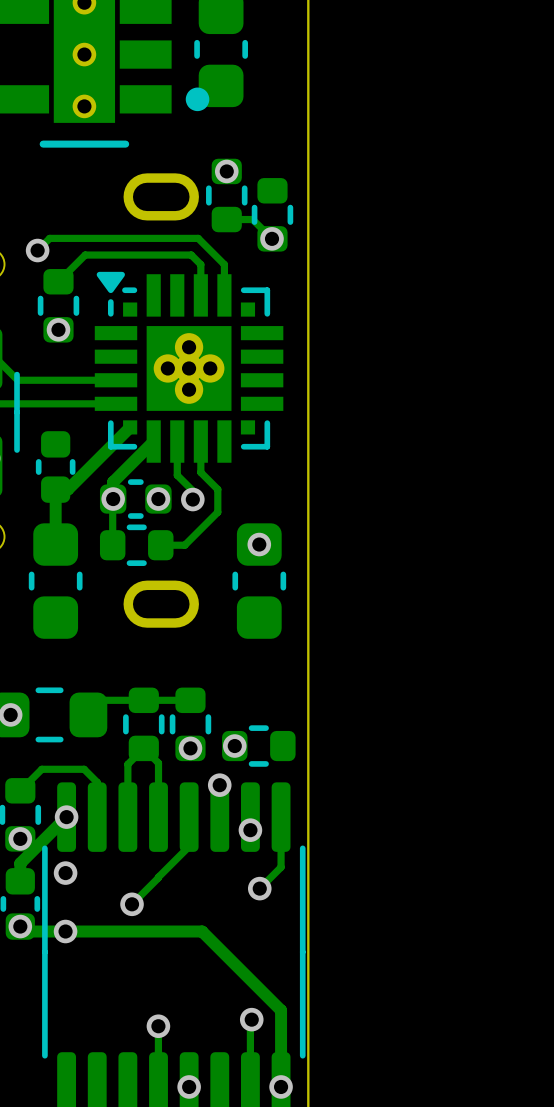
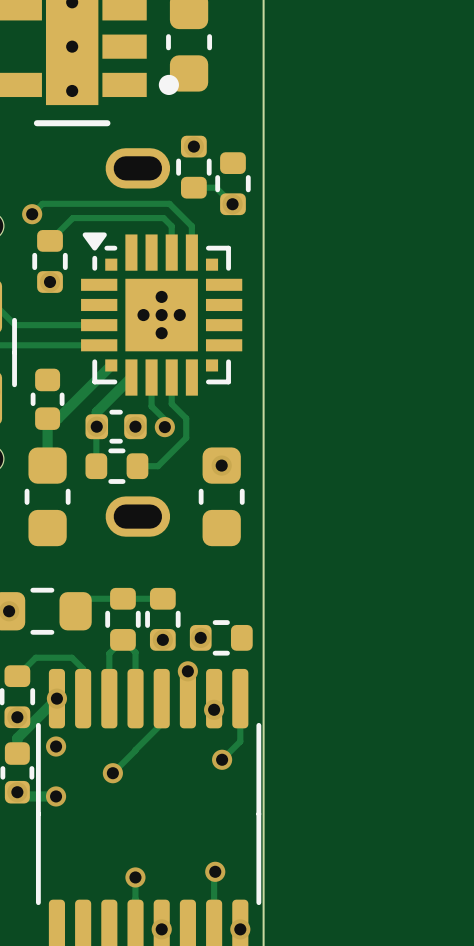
track: (65, 931) (202, 931) (281, 1010) (281, 1086) -> none

